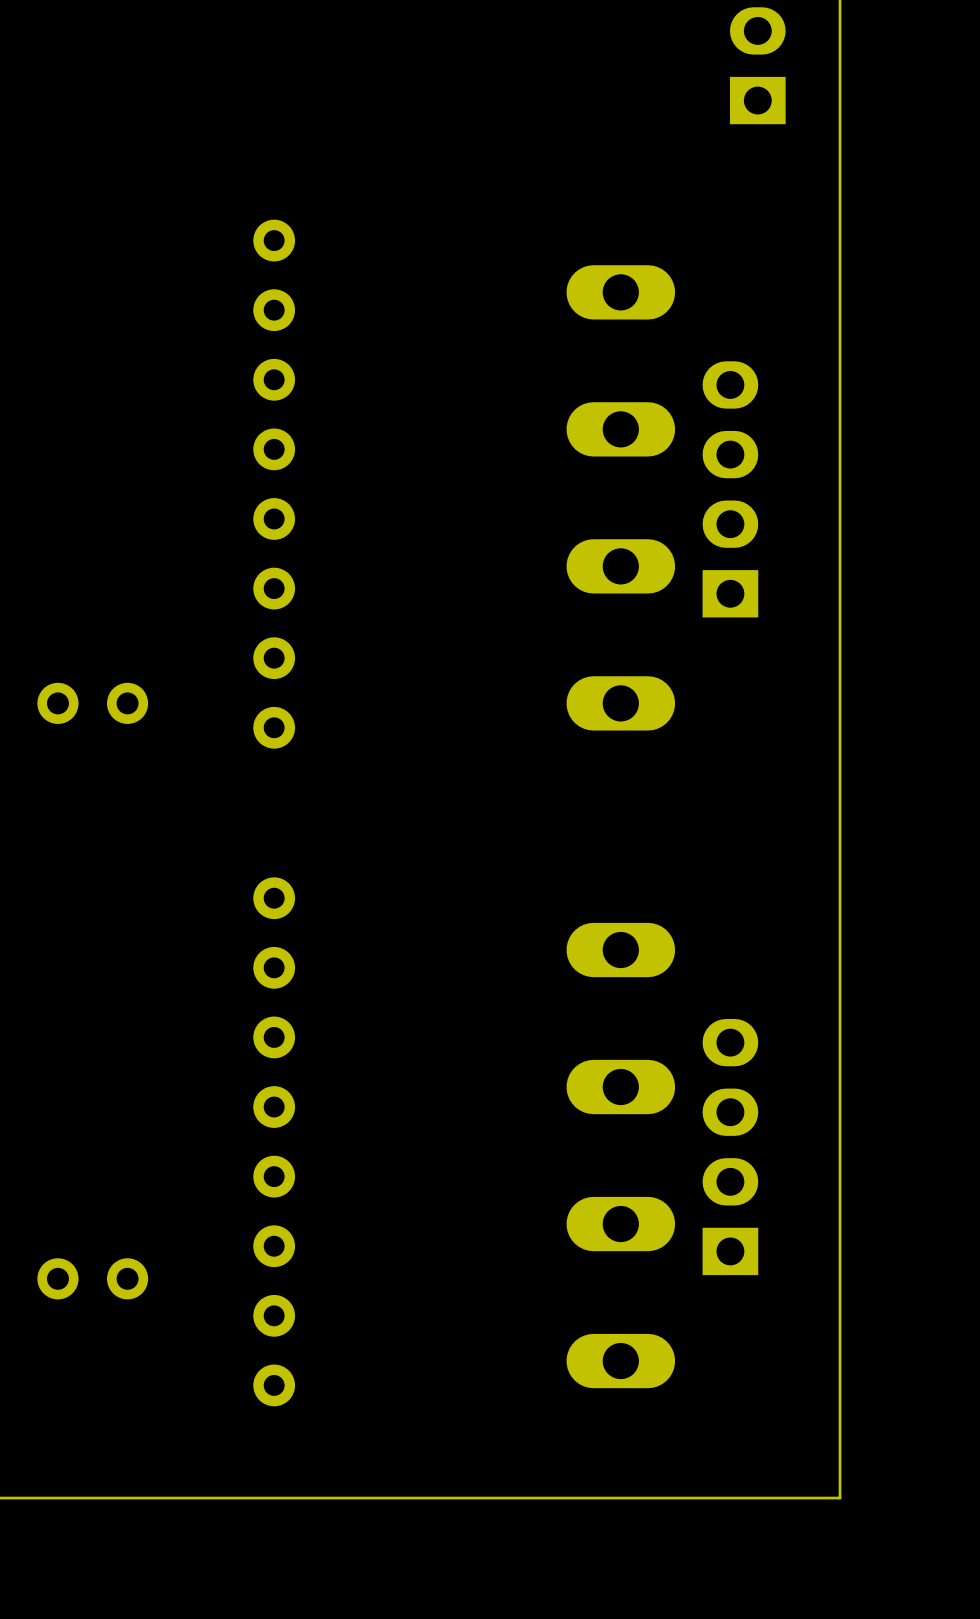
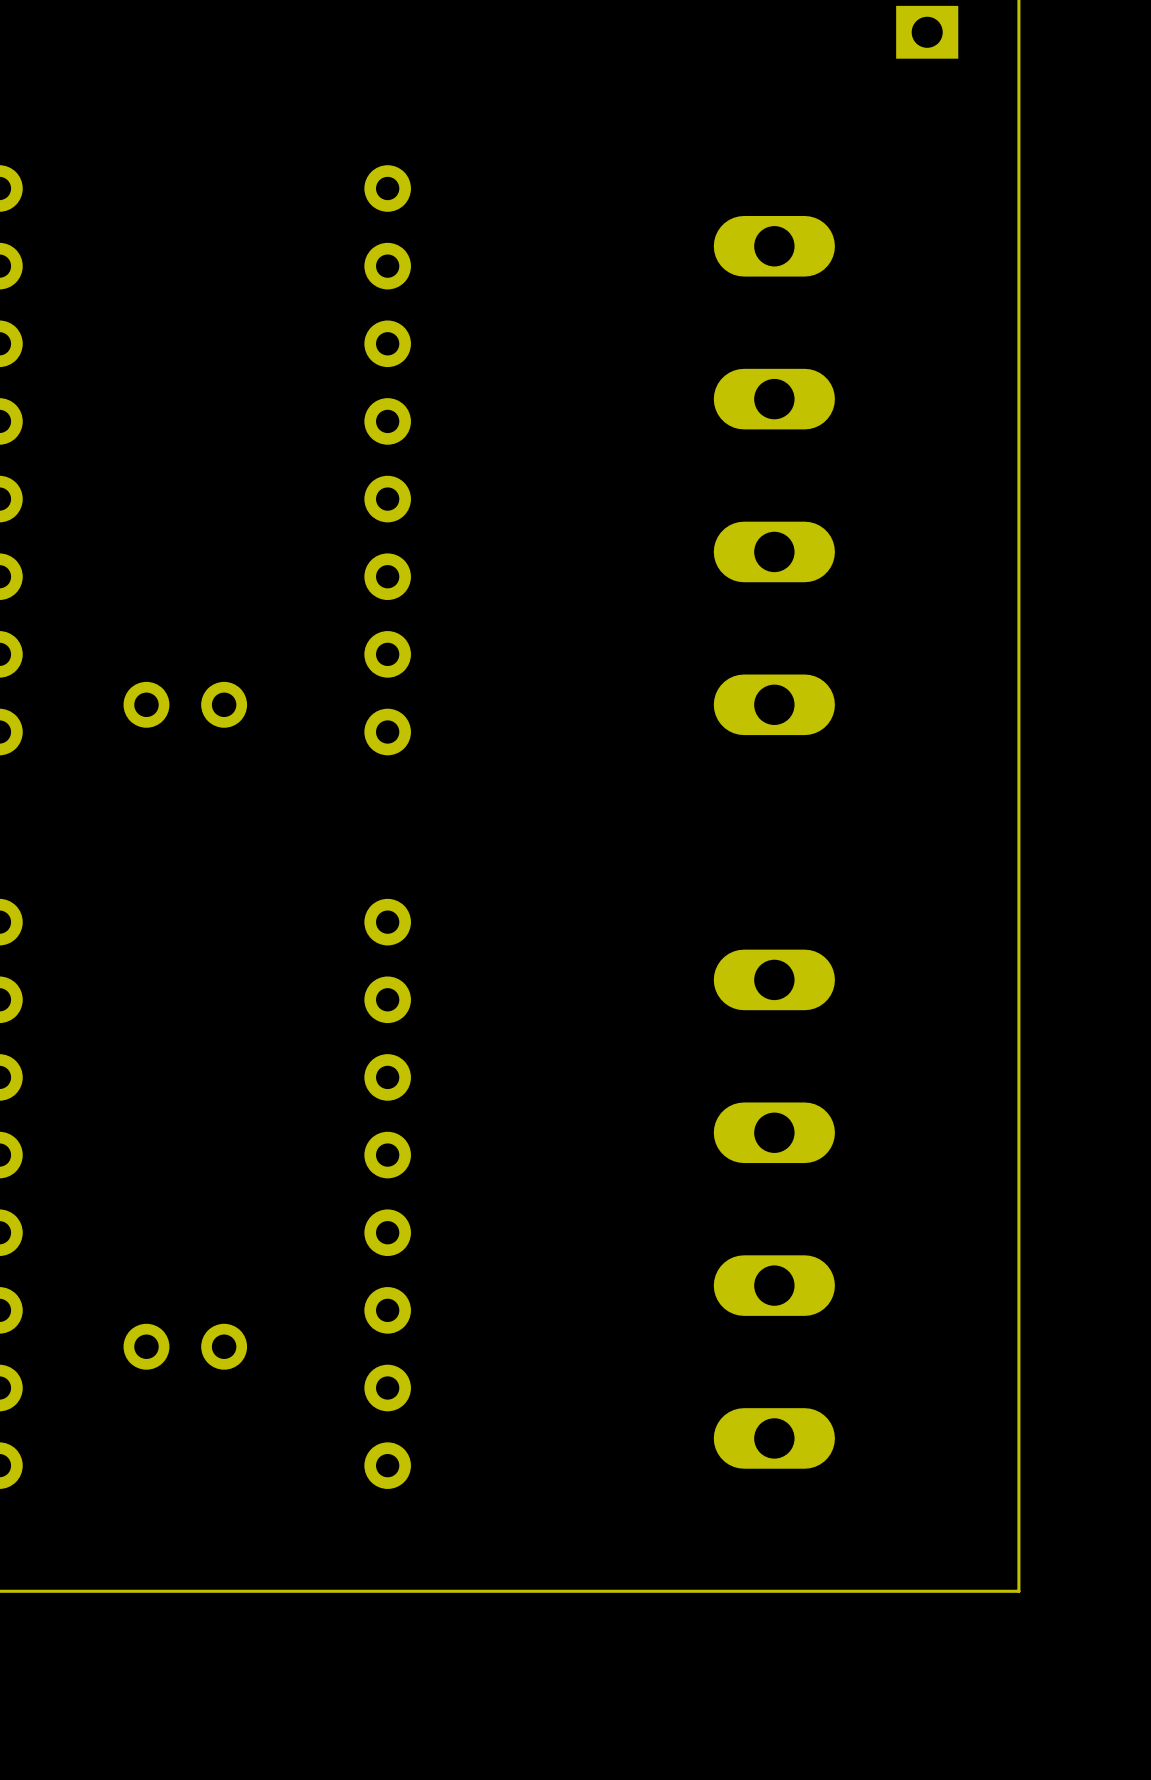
part: (730, 489) -> none
part: (730, 1147) -> none

